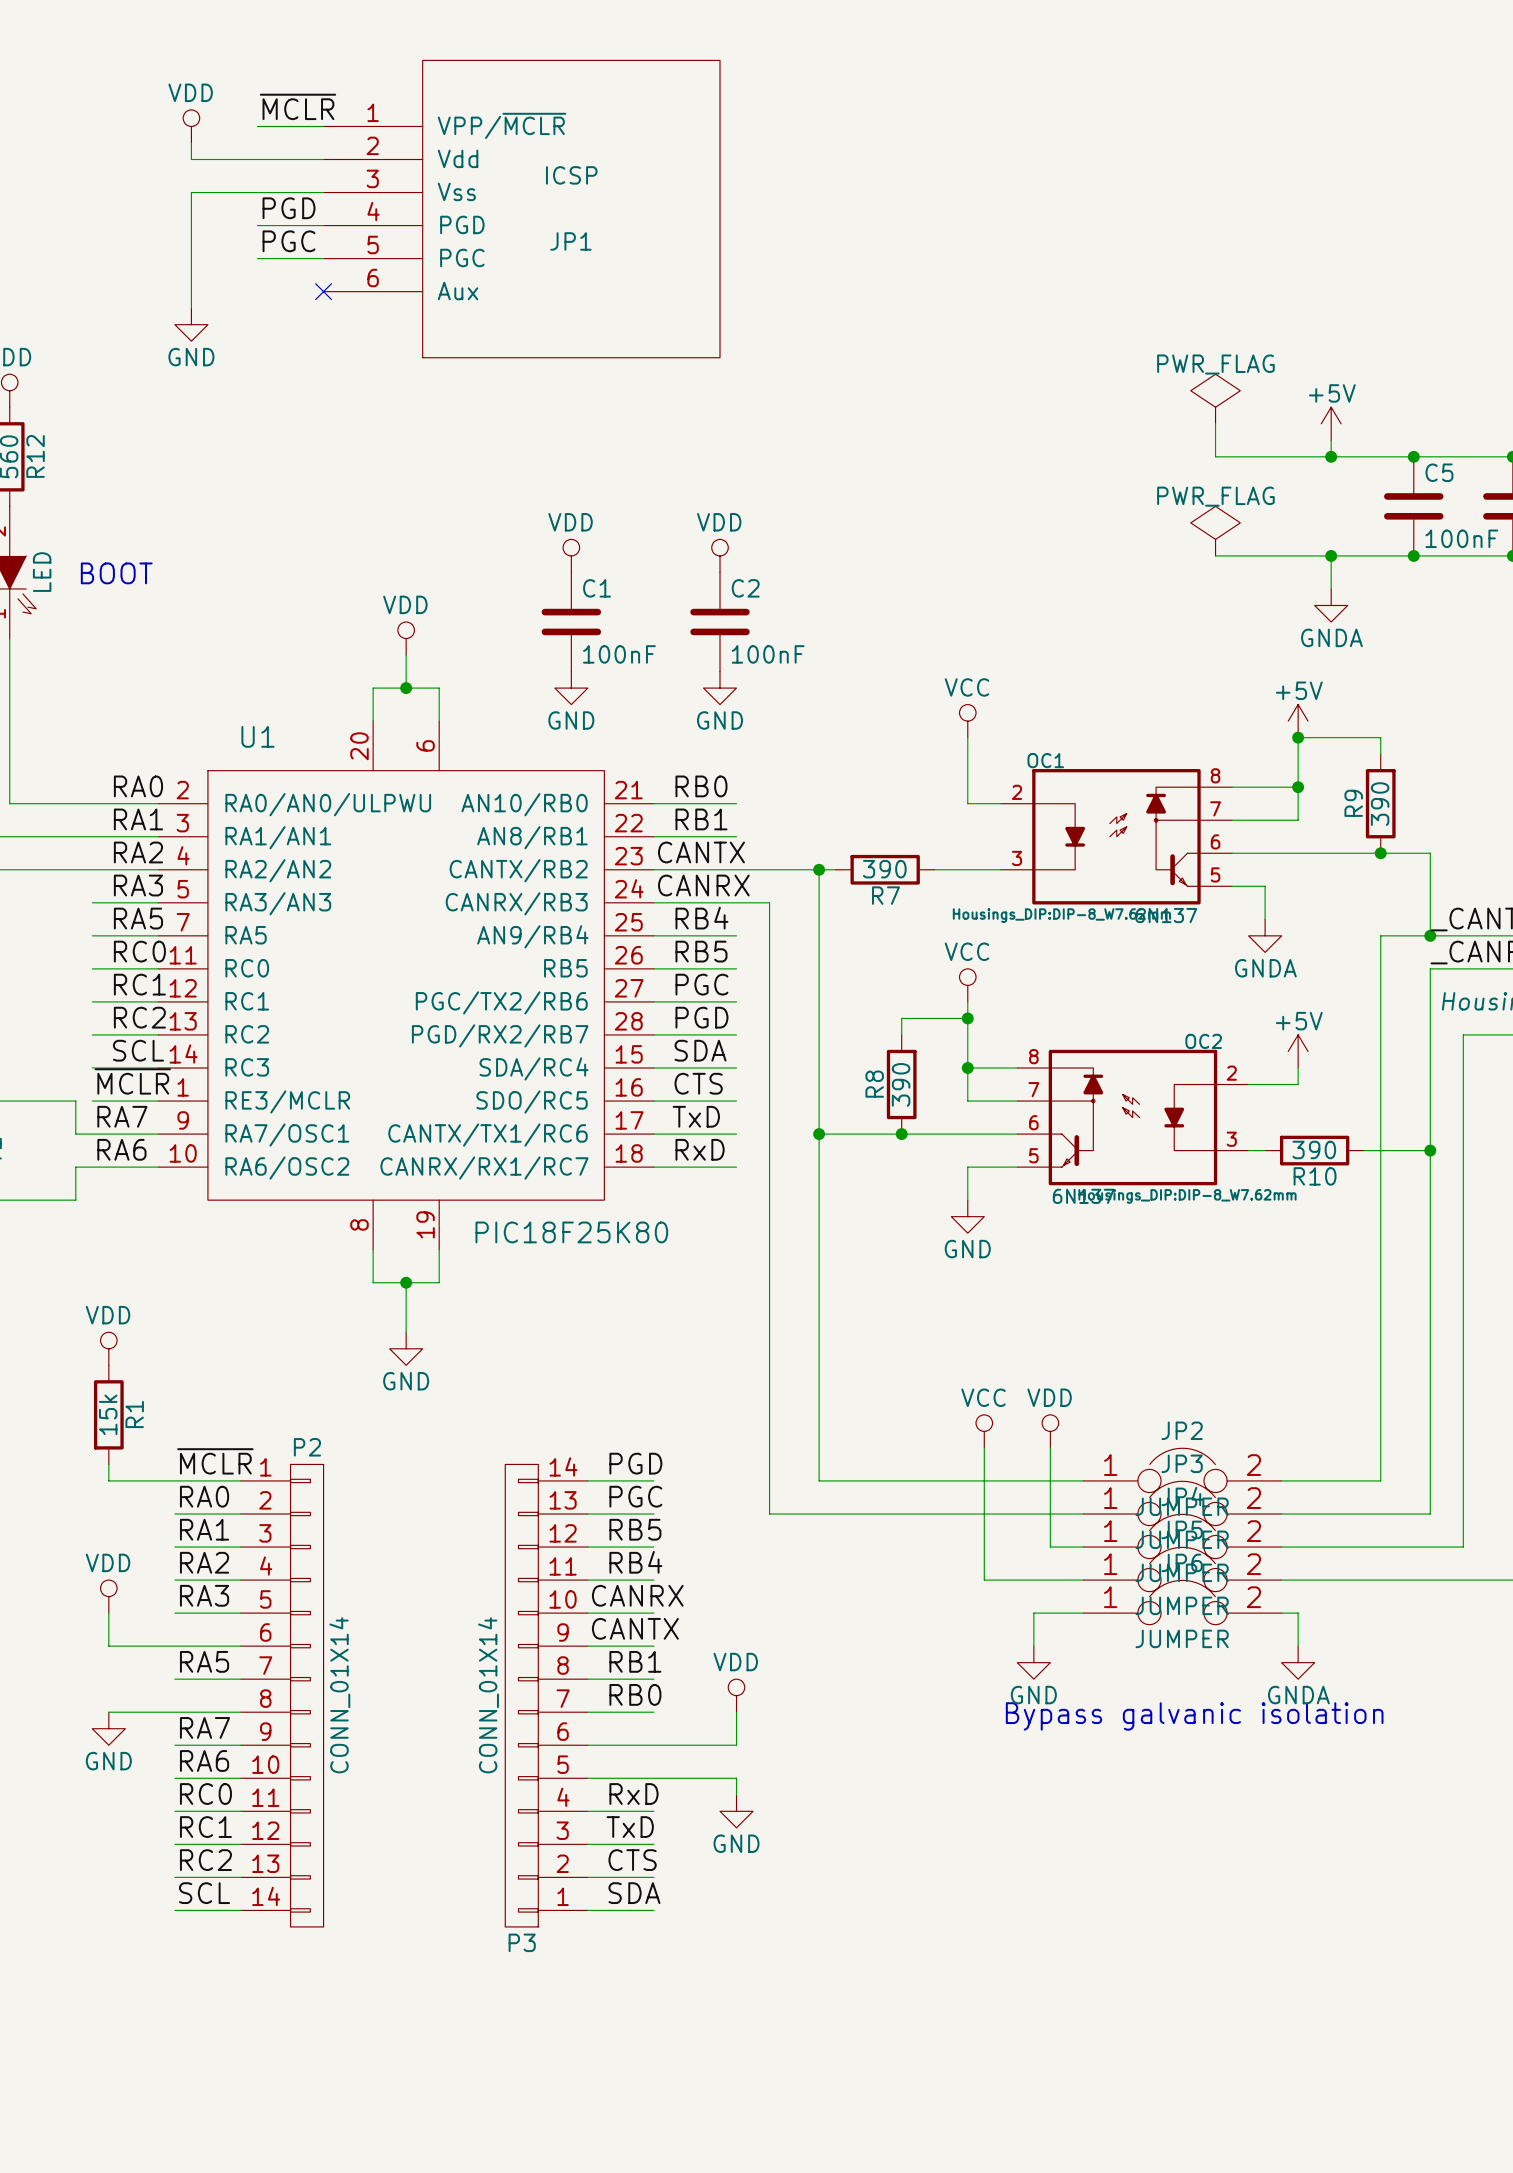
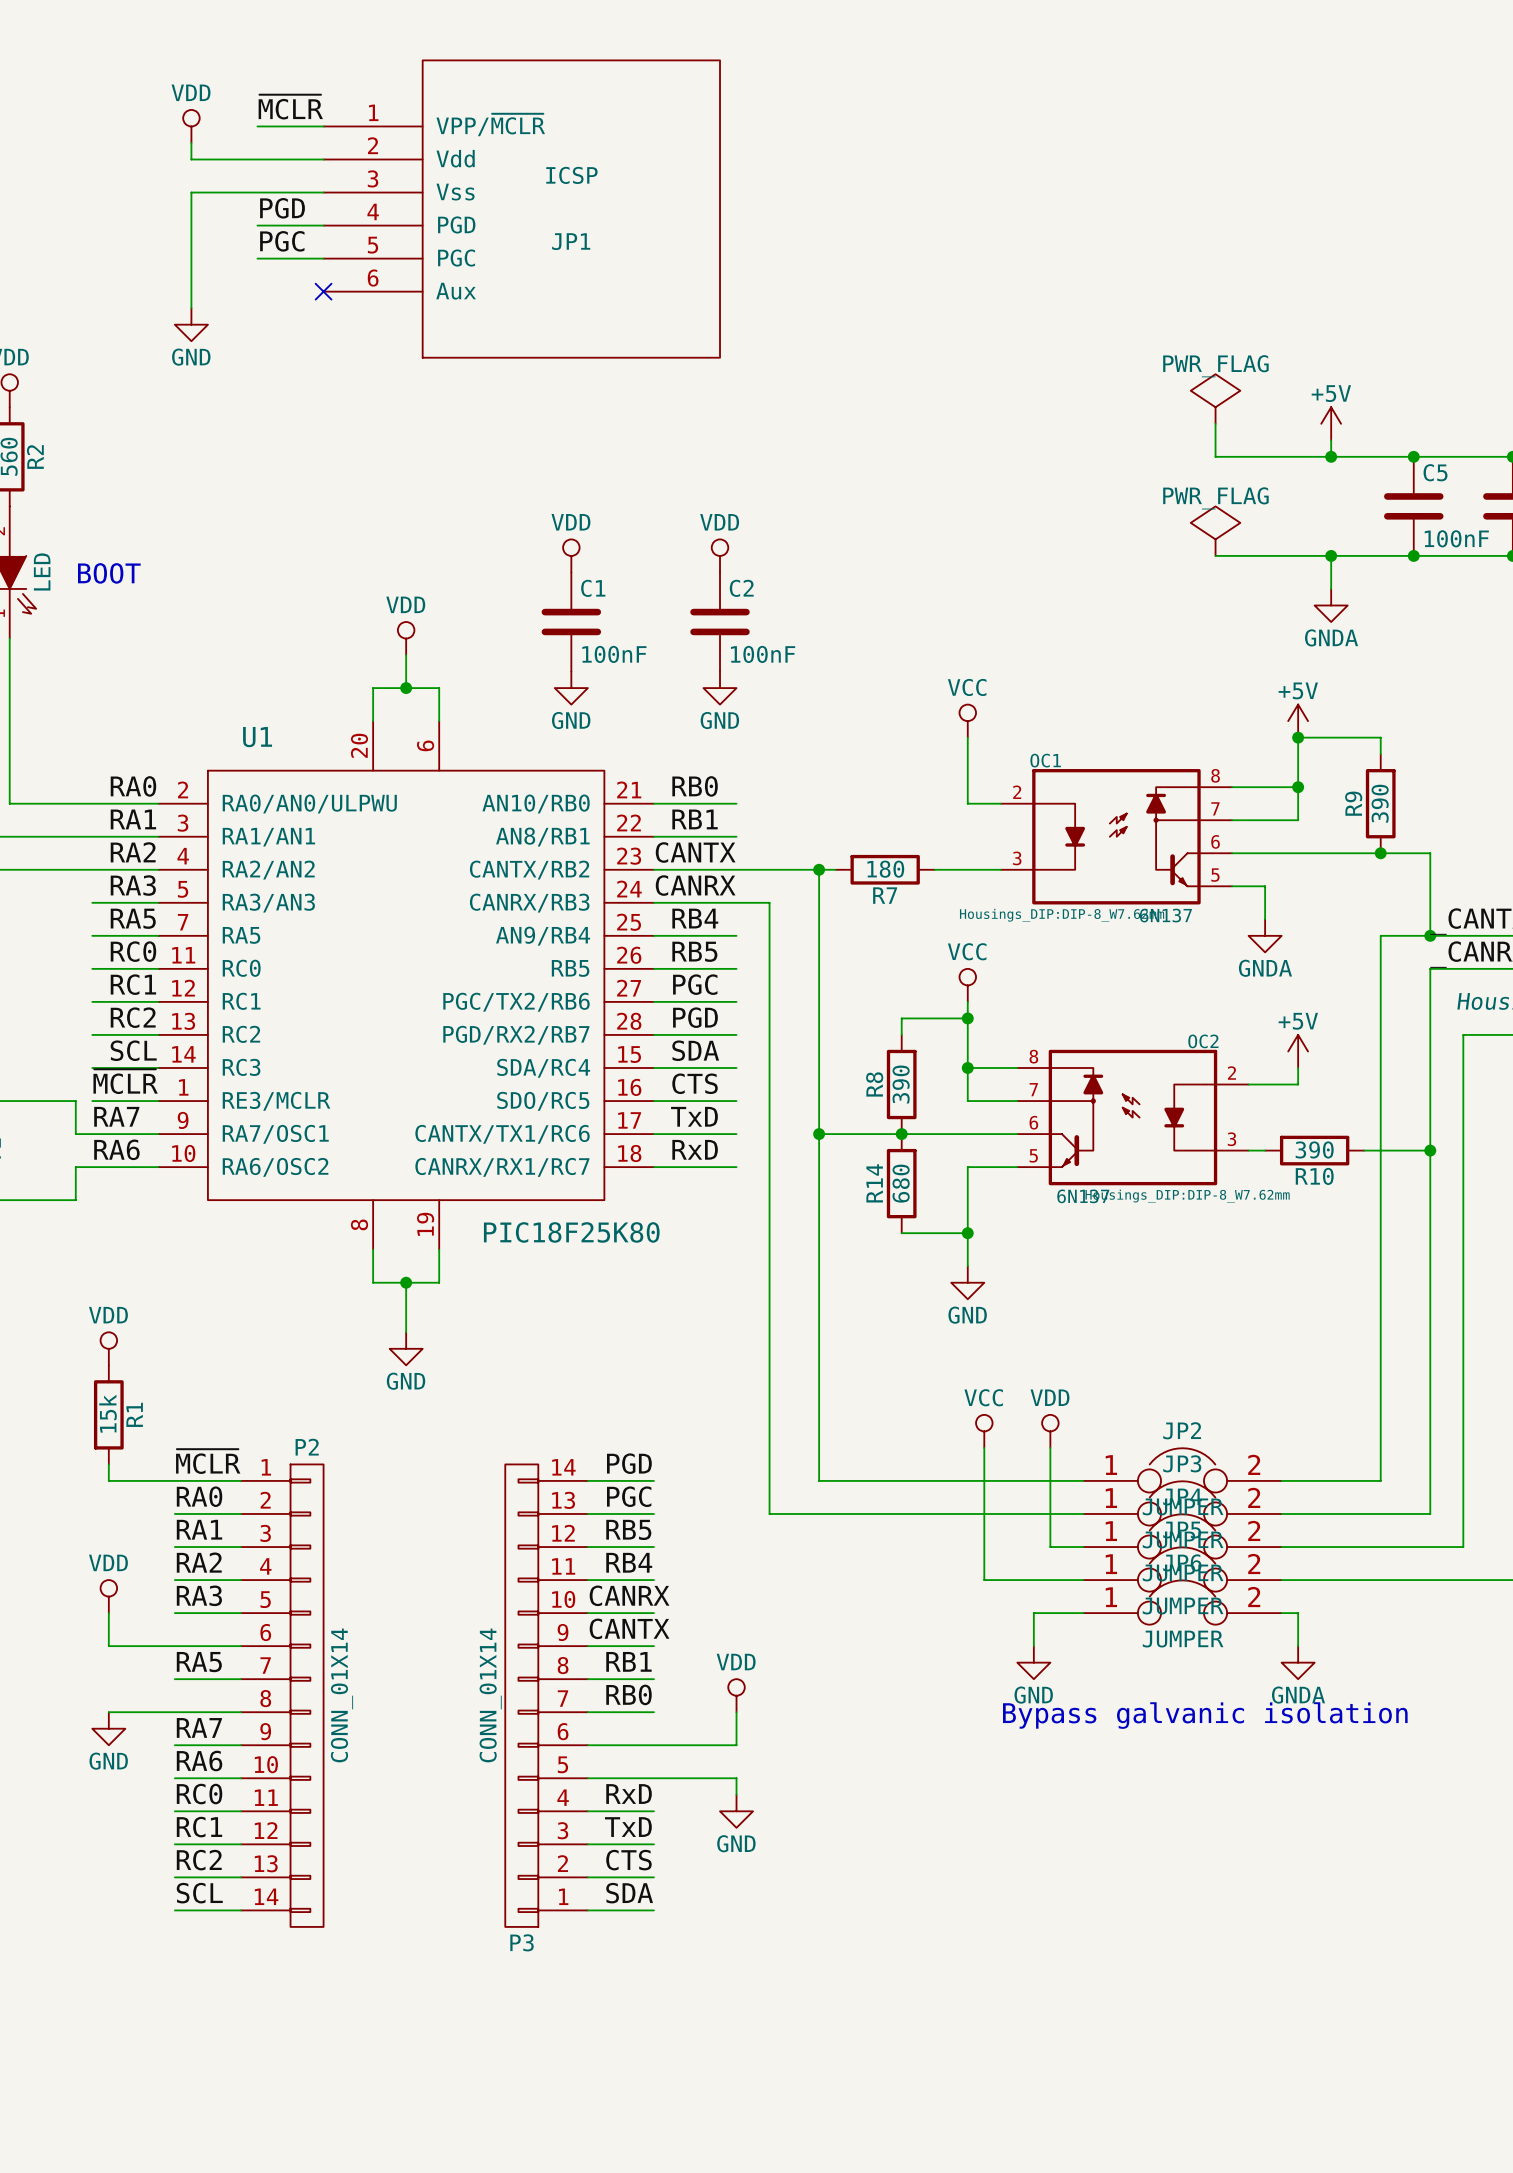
R12 name: R12 (35, 456) -> R2 (35, 457)
R7 value: 390 (884, 869) -> 180 (885, 869)
R14: none -> 680 (901, 1183)
wire: none -> (967, 1200) (967, 1266)
power symbol position: GND (967, 1216) -> GND (967, 1282)
wire: none -> (901, 1233) (967, 1233)
junction: none -> (967, 1233)

